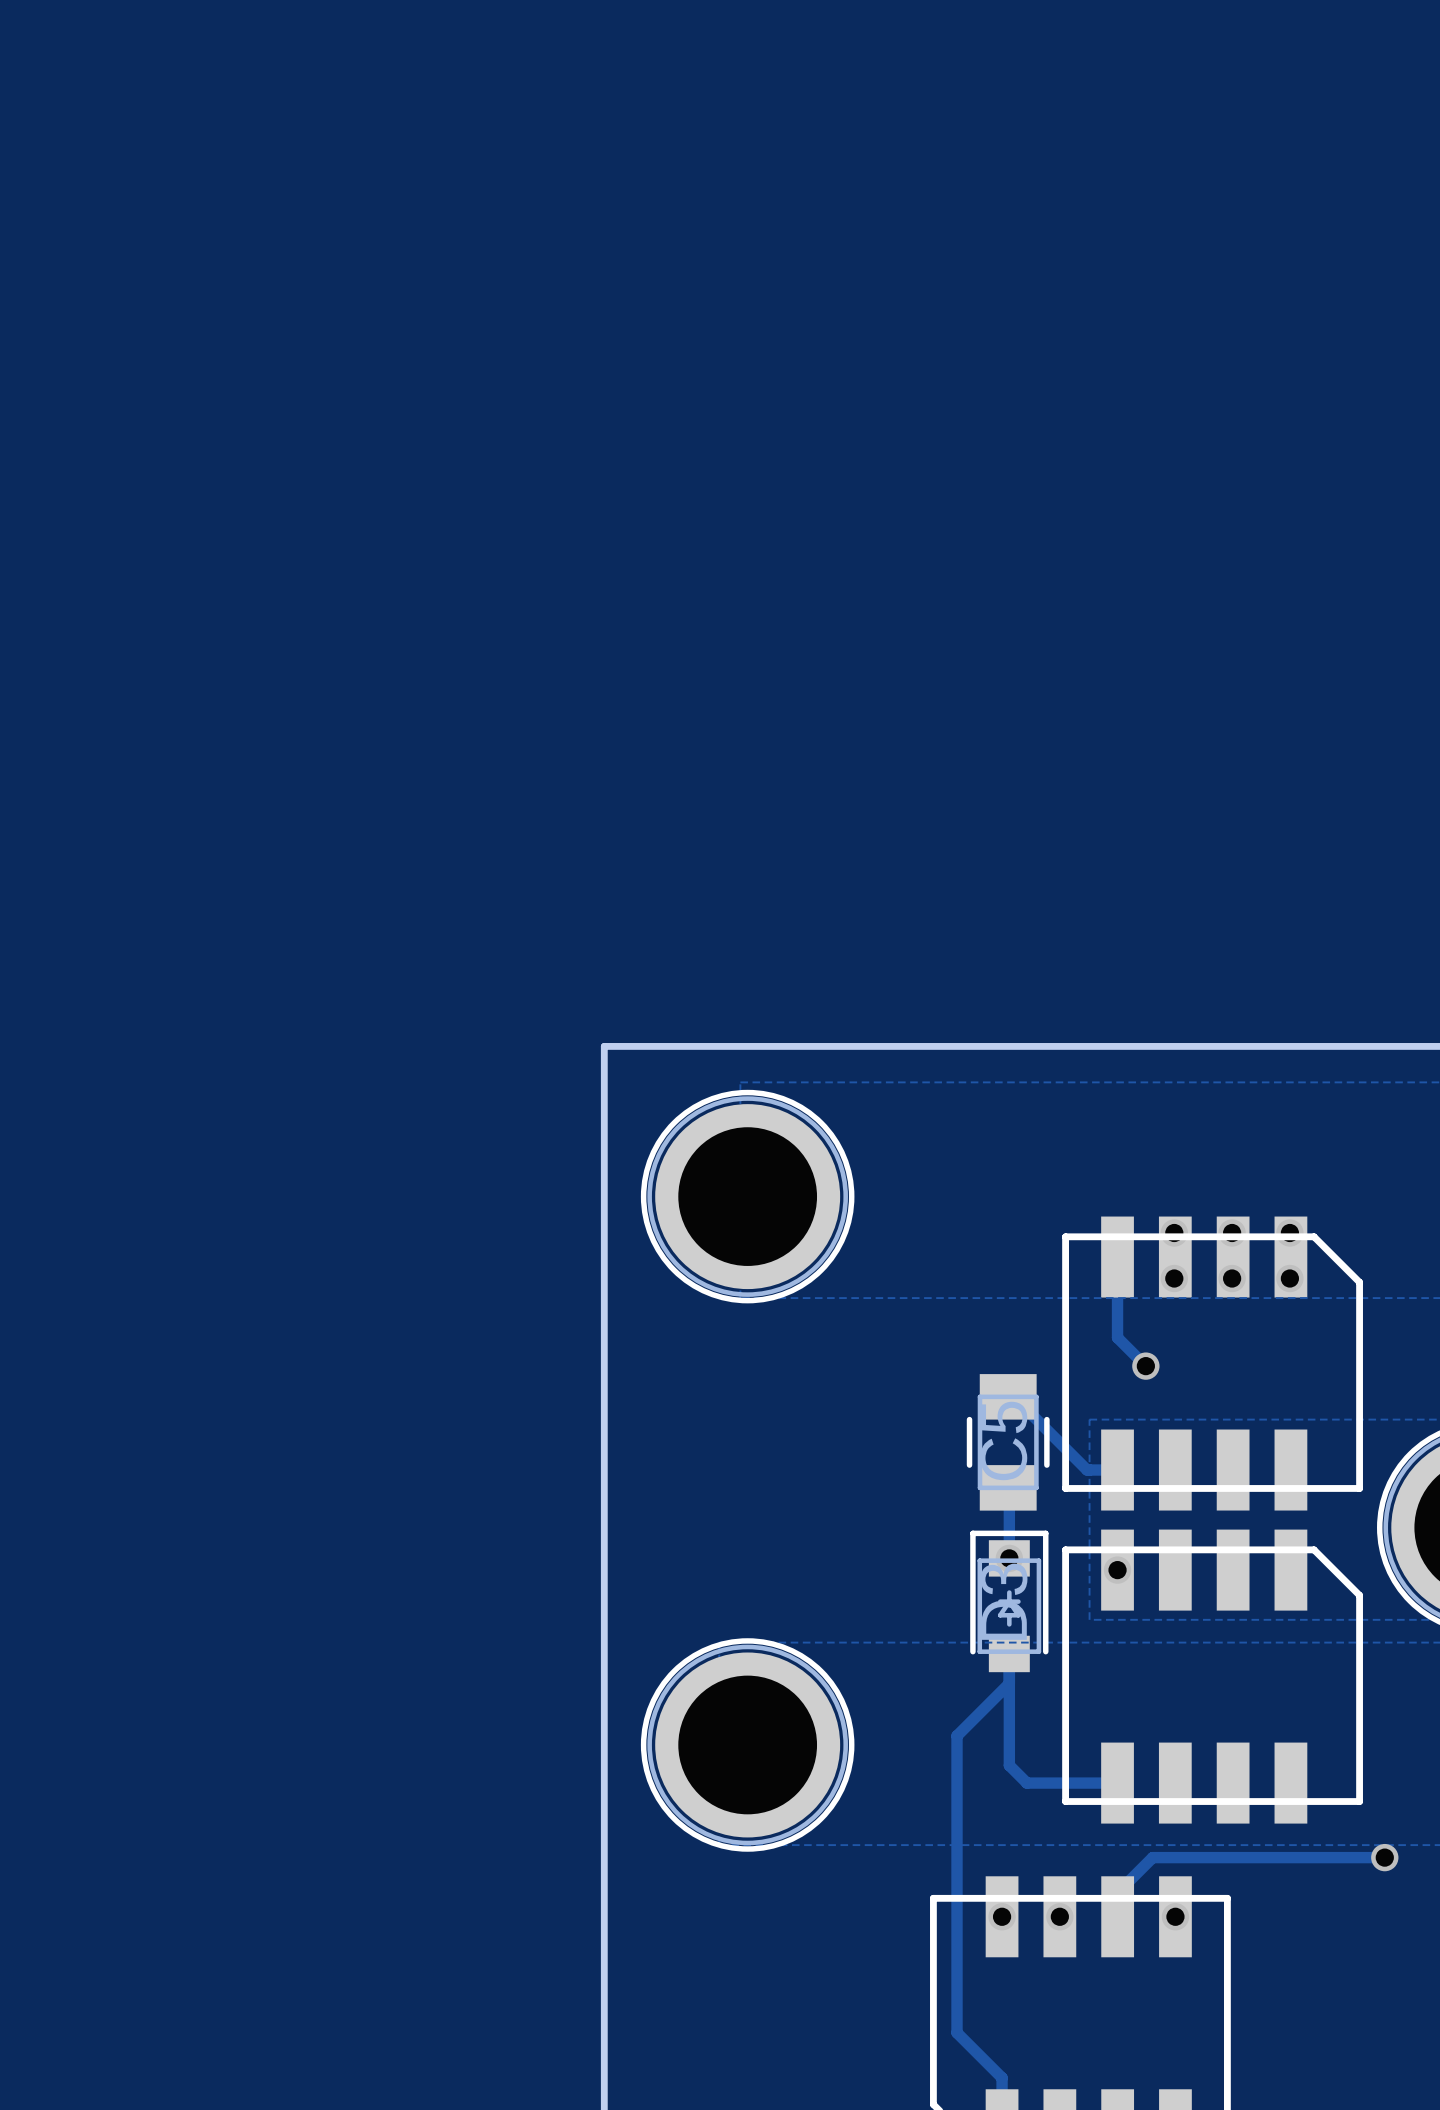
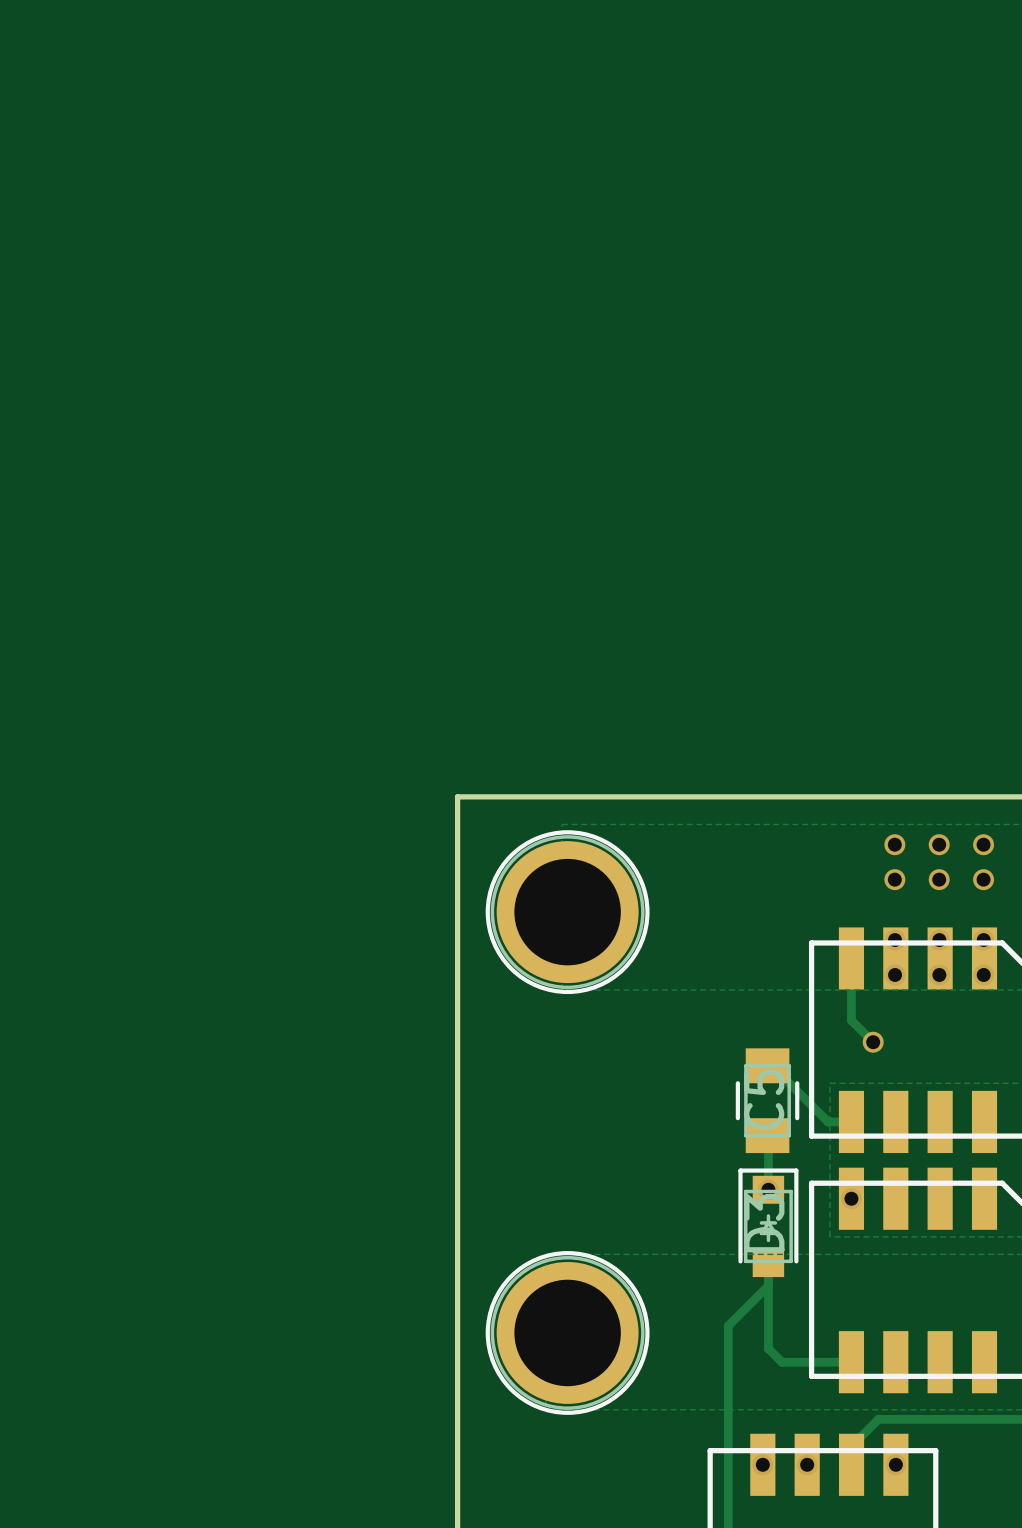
via: none -> (894, 844)
via: none -> (939, 844)
via: none -> (983, 844)
via: none -> (894, 879)
via: none -> (939, 879)
via: none -> (983, 879)

